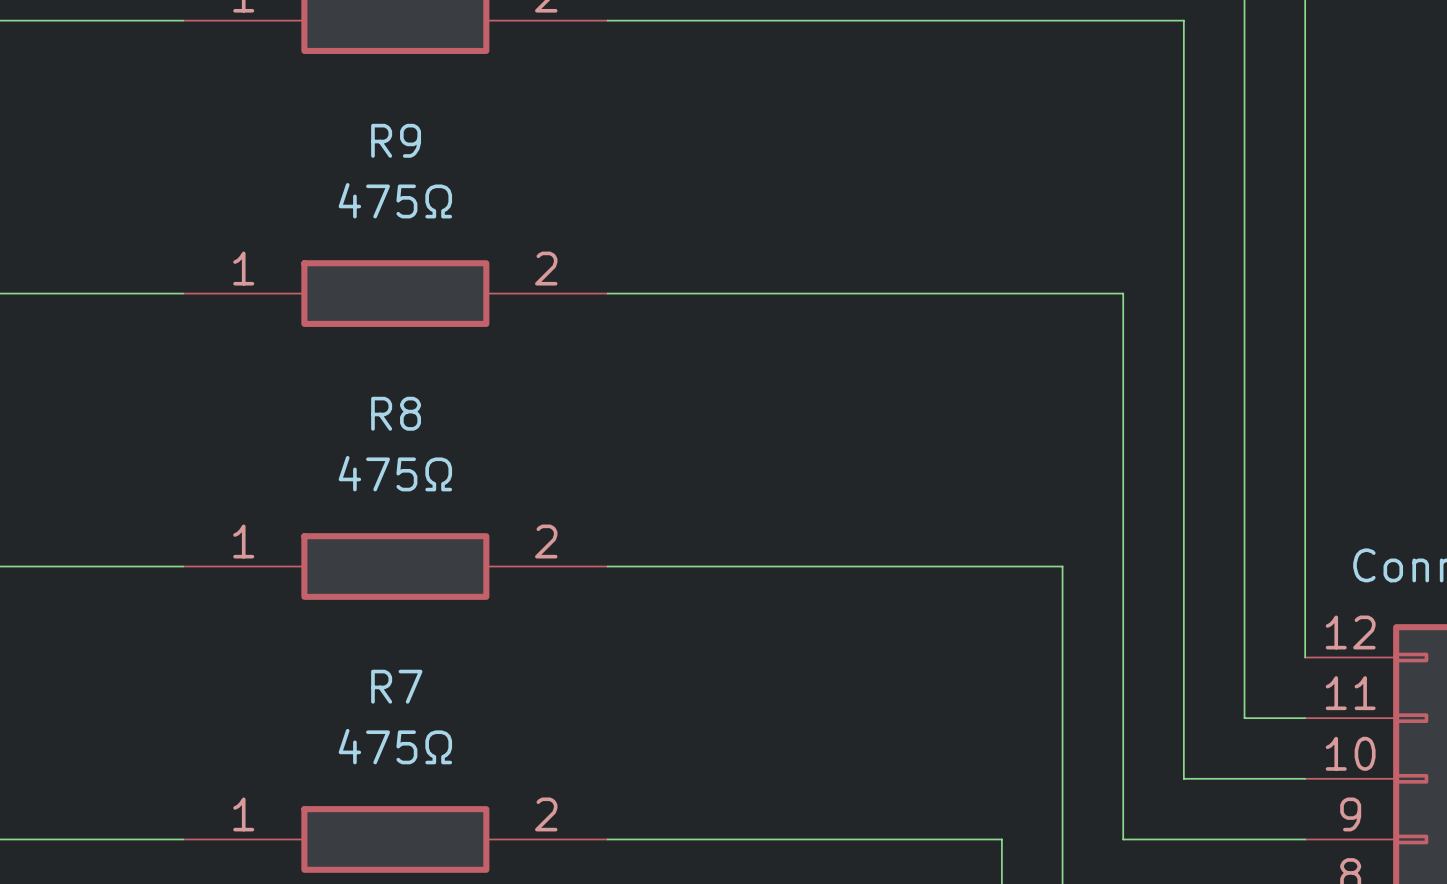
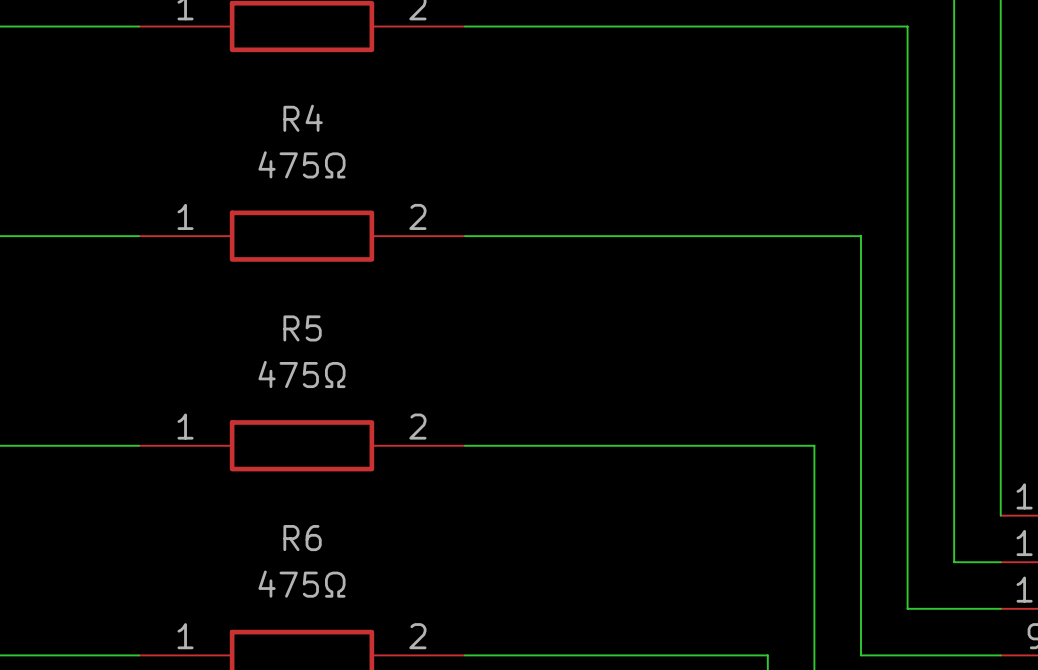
R9 name: R9 (396, 140) -> R4 (303, 118)
R8 name: R8 (396, 413) -> R5 (302, 328)
R7 name: R7 (396, 686) -> R6 (302, 538)

